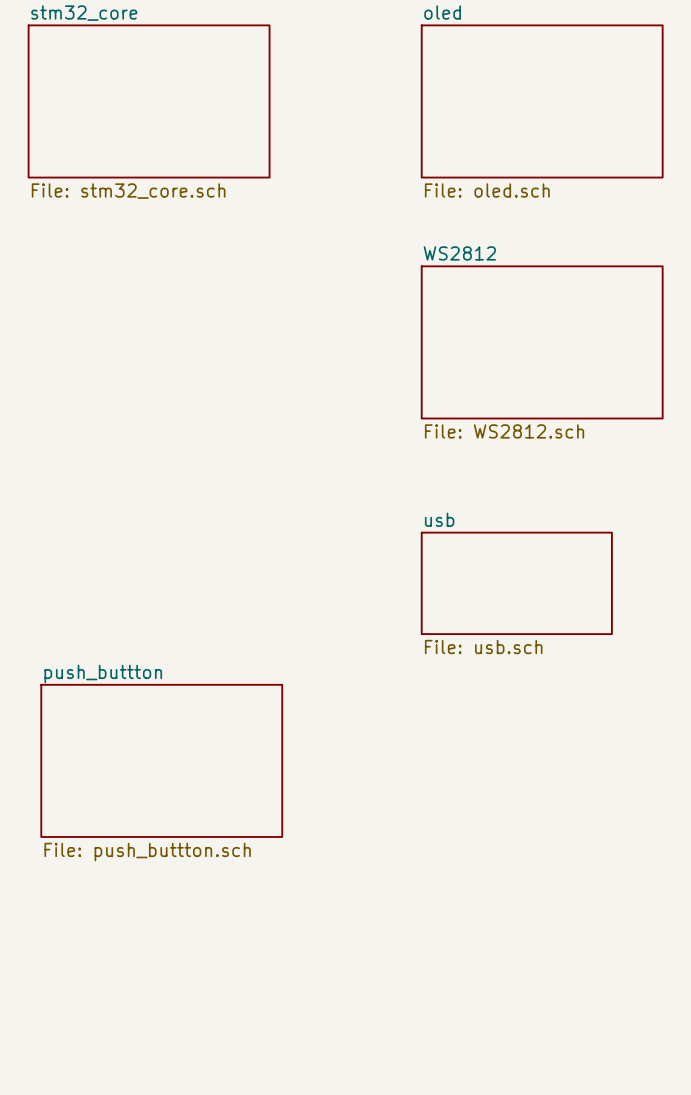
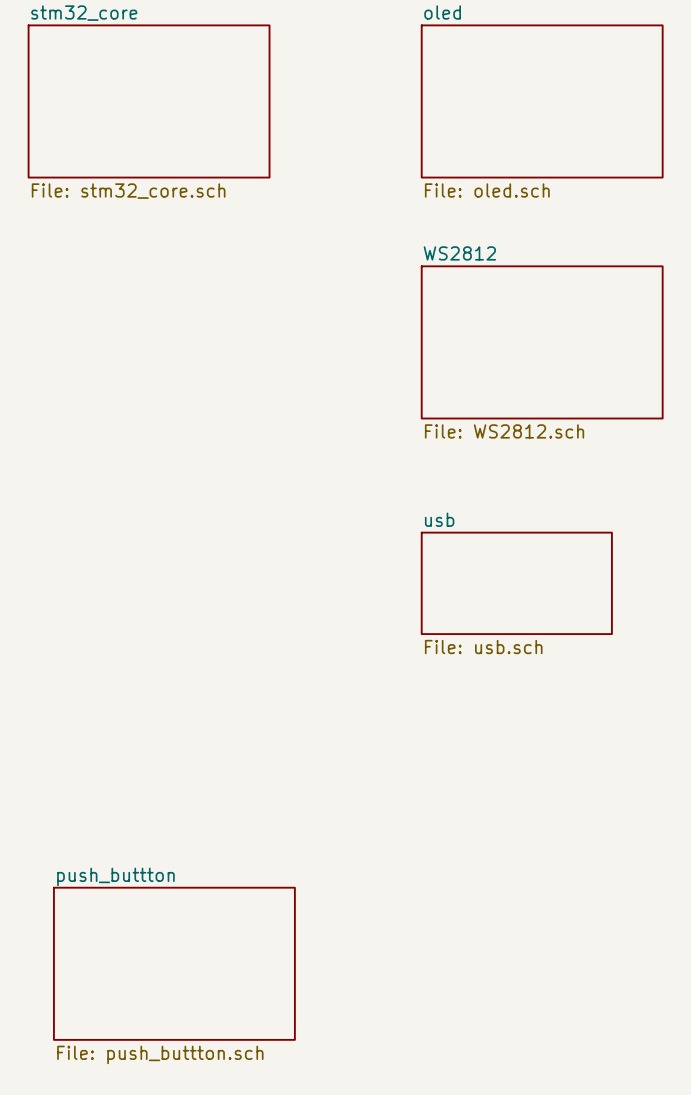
sheet push_buttton position: (161, 760) -> (174, 963)

